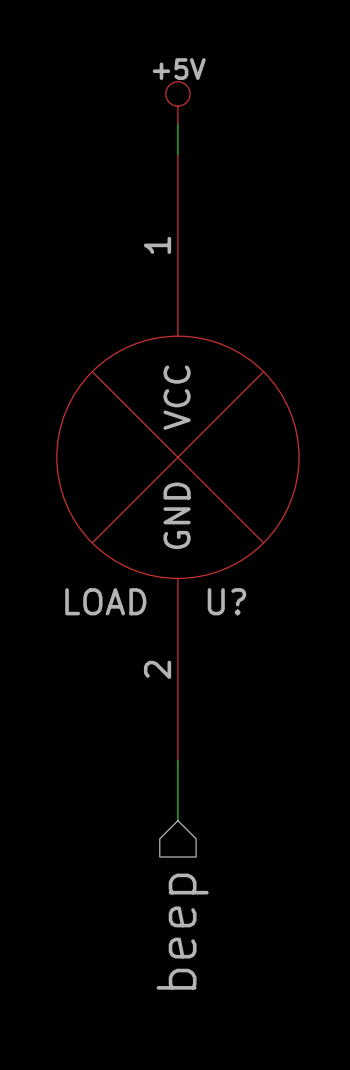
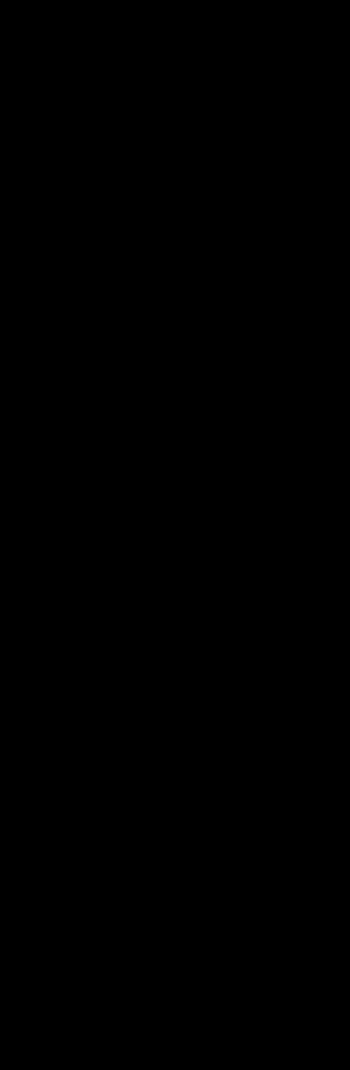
power symbol: +5V (177, 103) -> none
wire: (177, 124) (177, 154) -> none
U?: LOAD (177, 457) -> none
wire: (177, 760) (177, 820) -> none
hierarchical label: beep (182, 931) -> none

